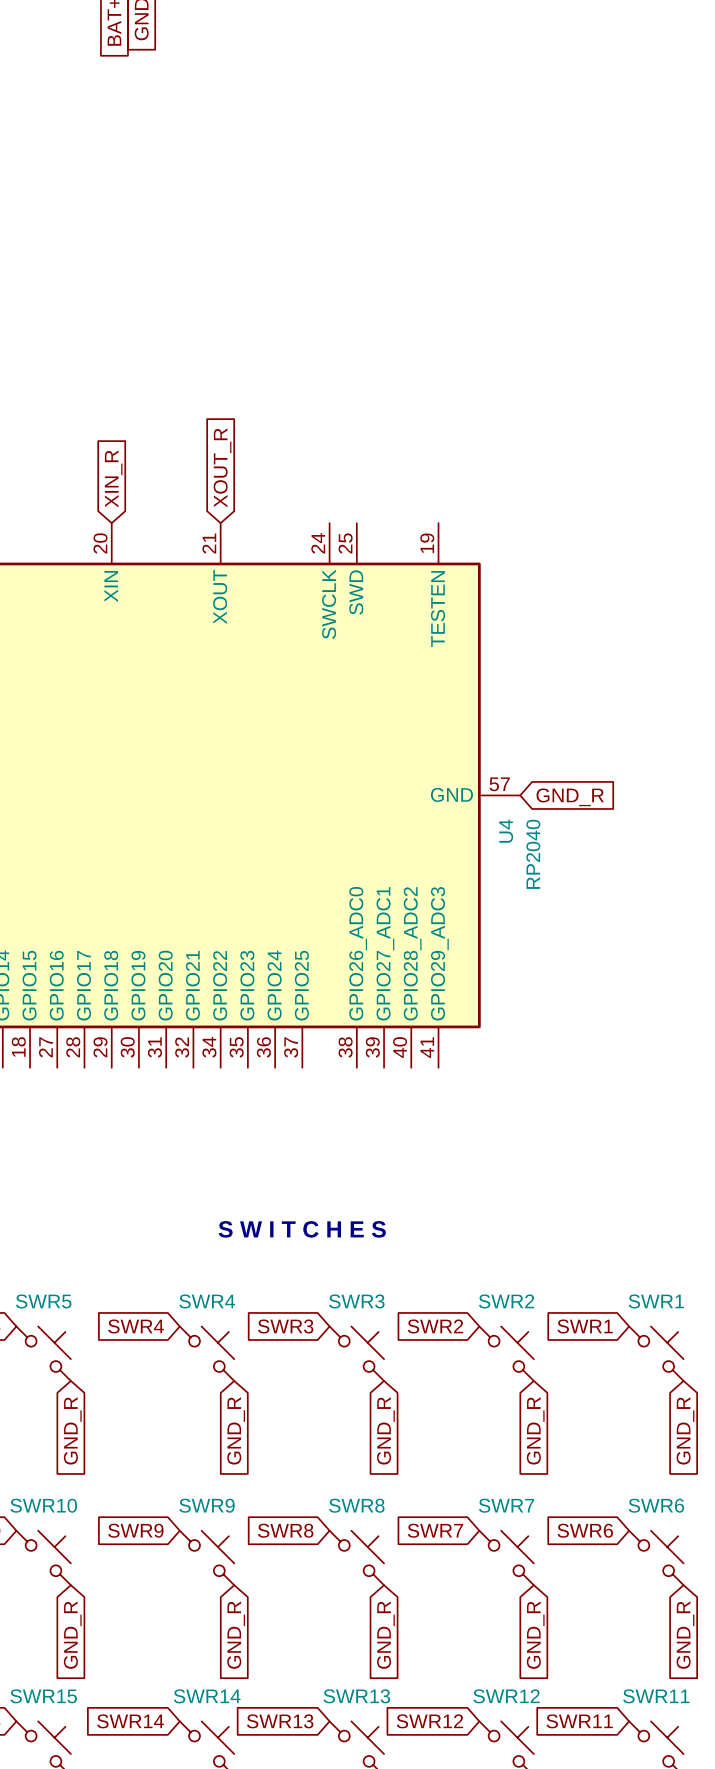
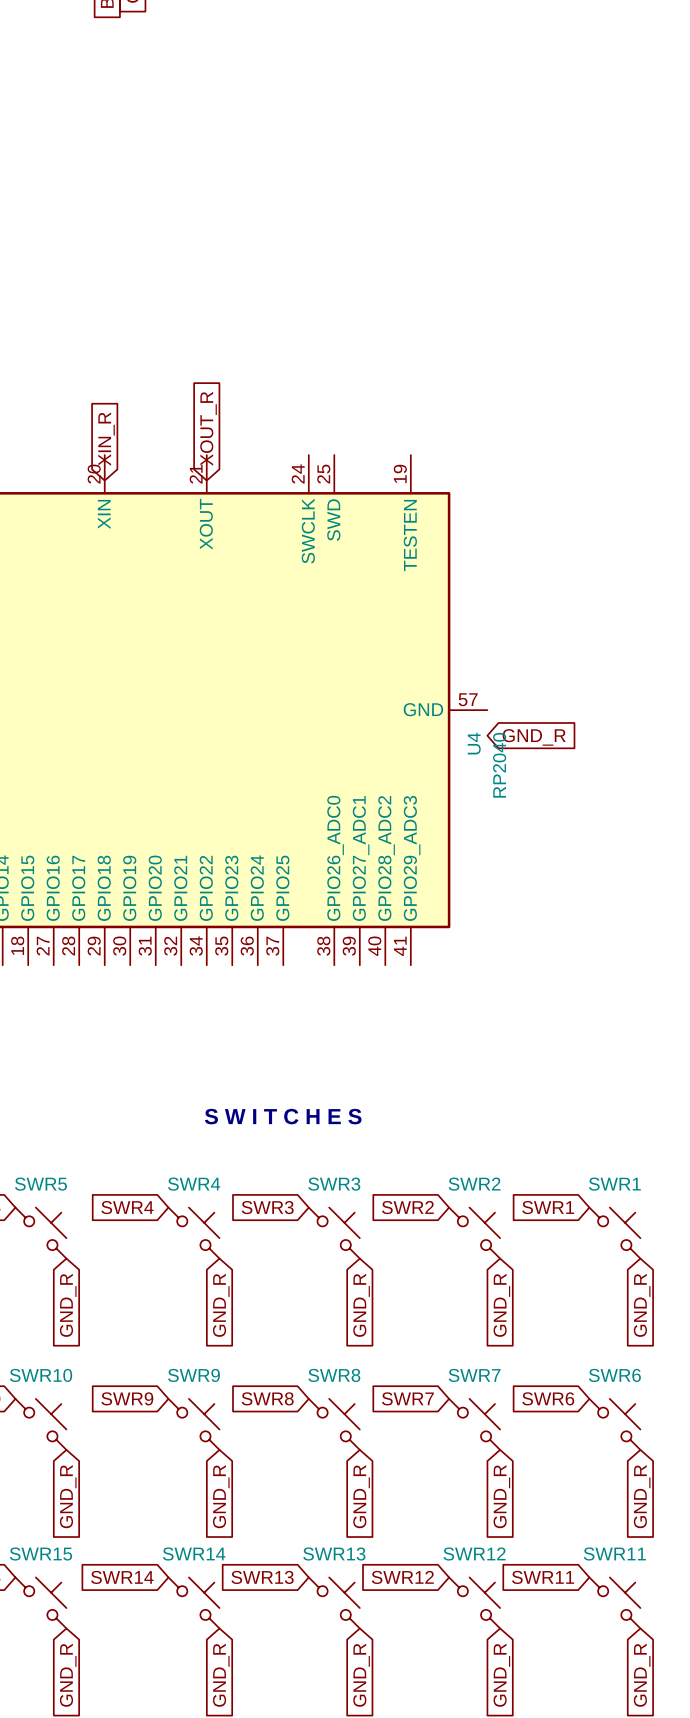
global label position: XOUT_R (222, 467) -> XOUT_R (208, 428)
global label position: XIN_R (113, 478) -> XIN_R (106, 439)
global label position: GND_R (570, 797) -> GND_R (534, 737)

